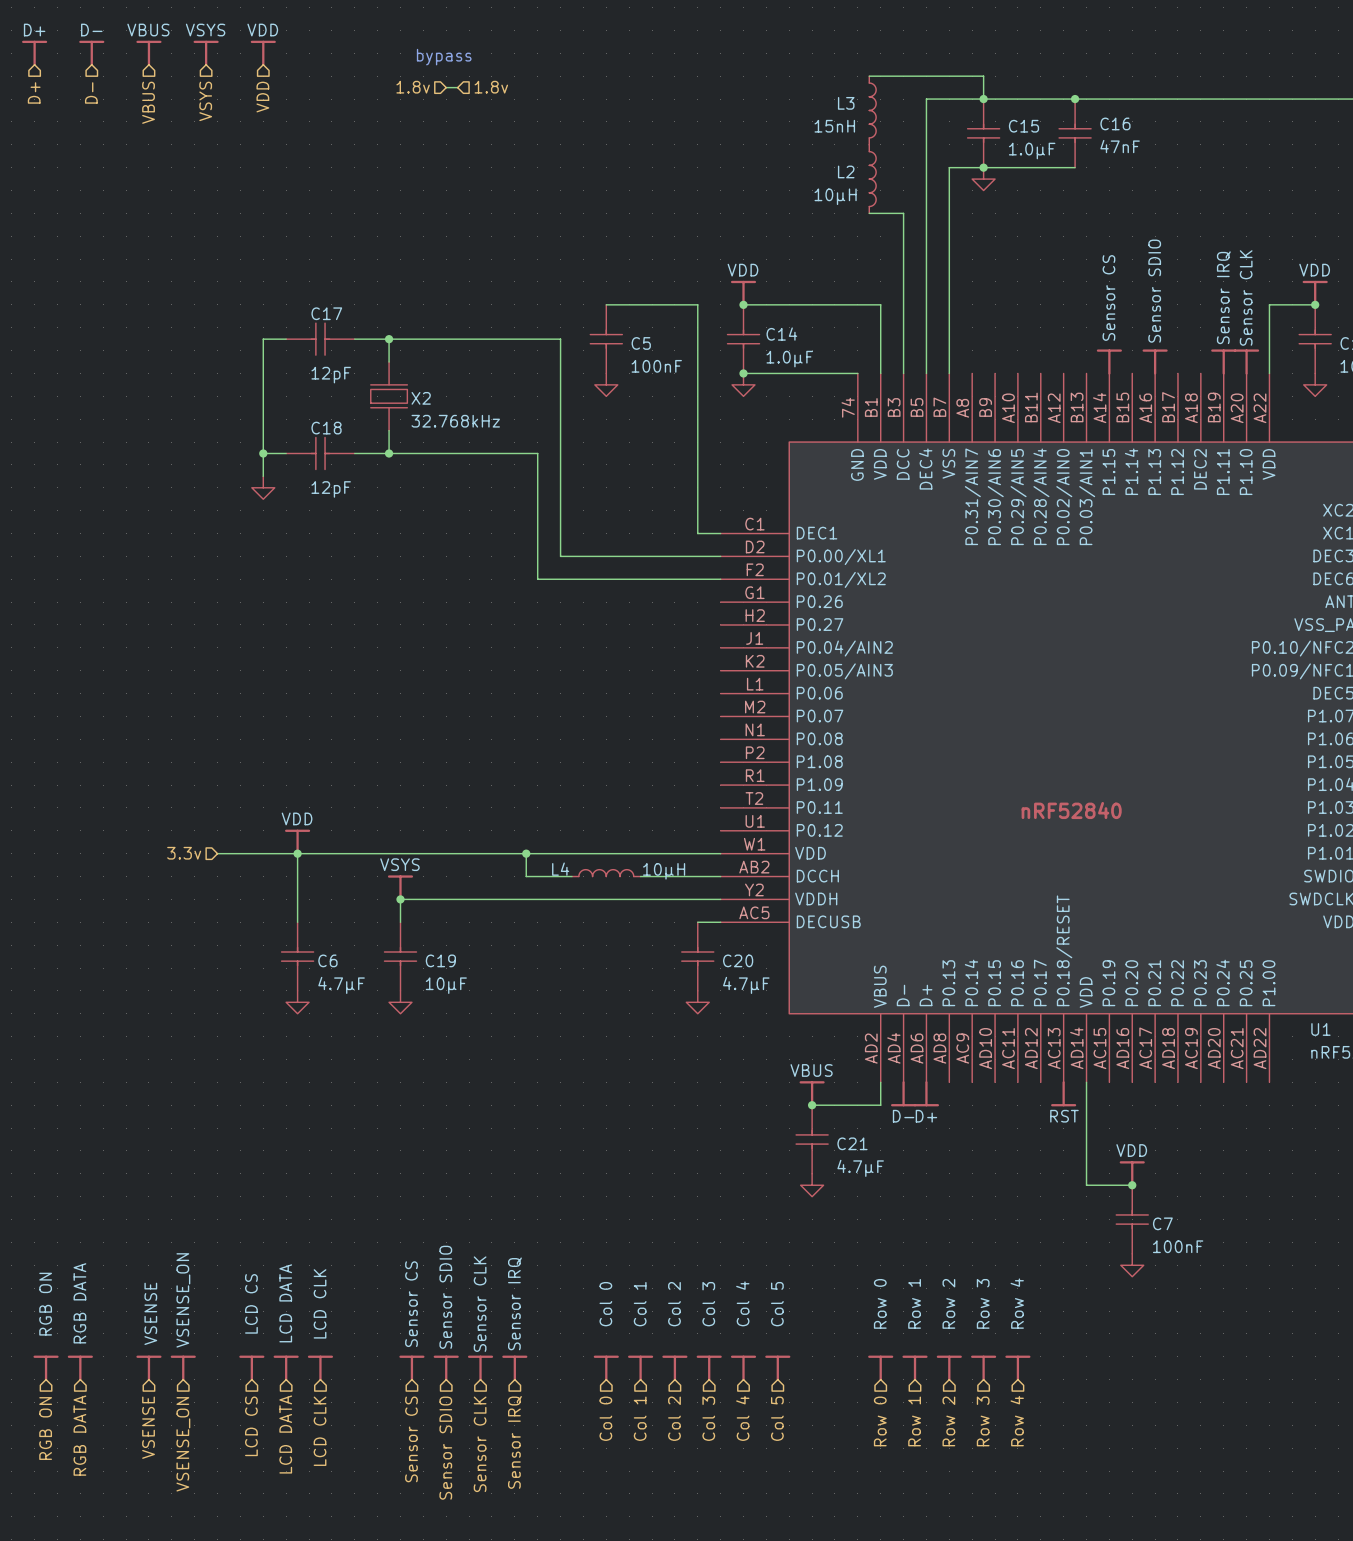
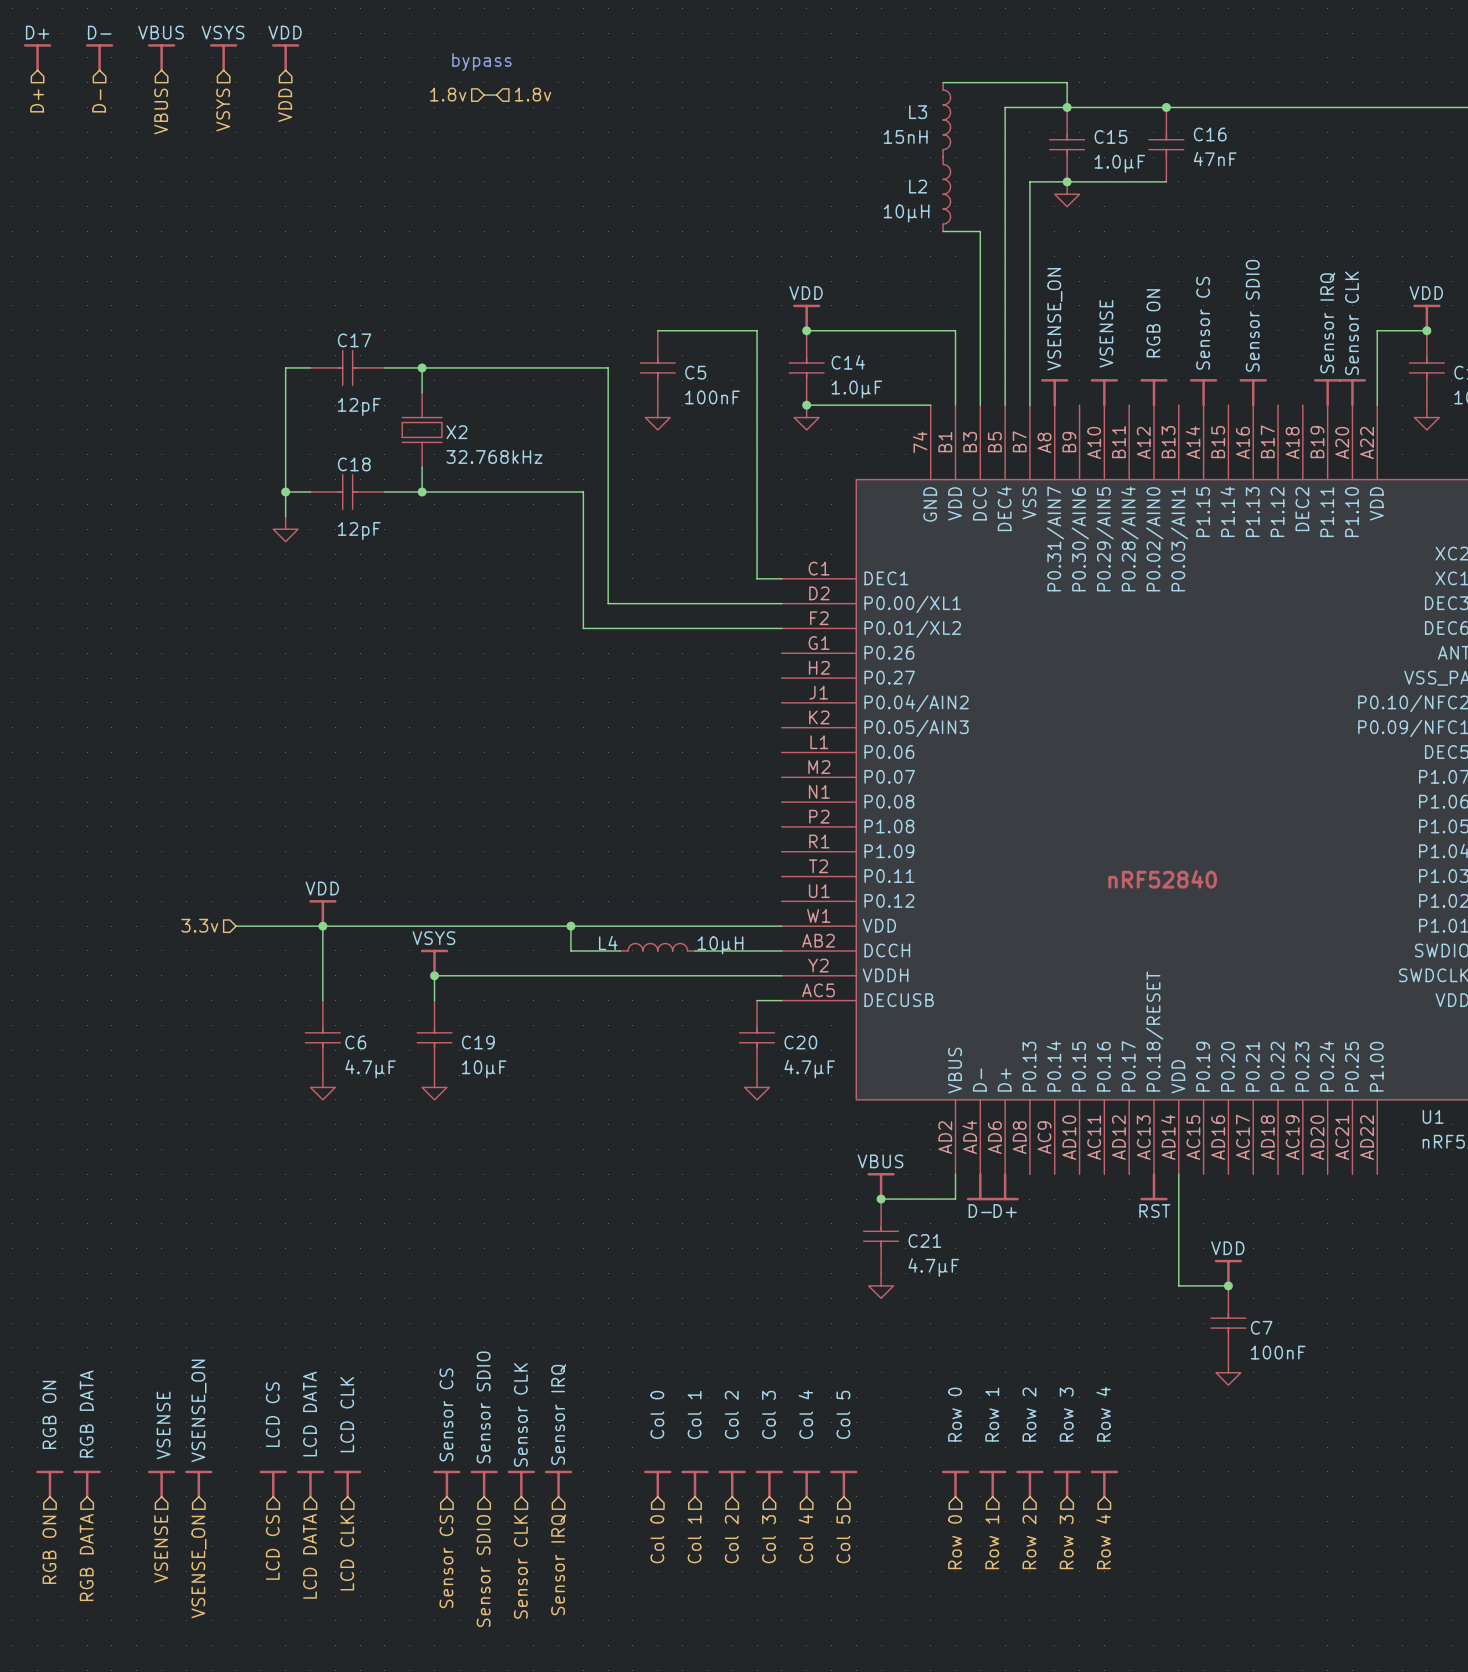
power symbol: none -> VSENSE_ON (1054, 392)
power symbol: none -> VSENSE (1104, 392)
power symbol: none -> RGB ON (1153, 392)

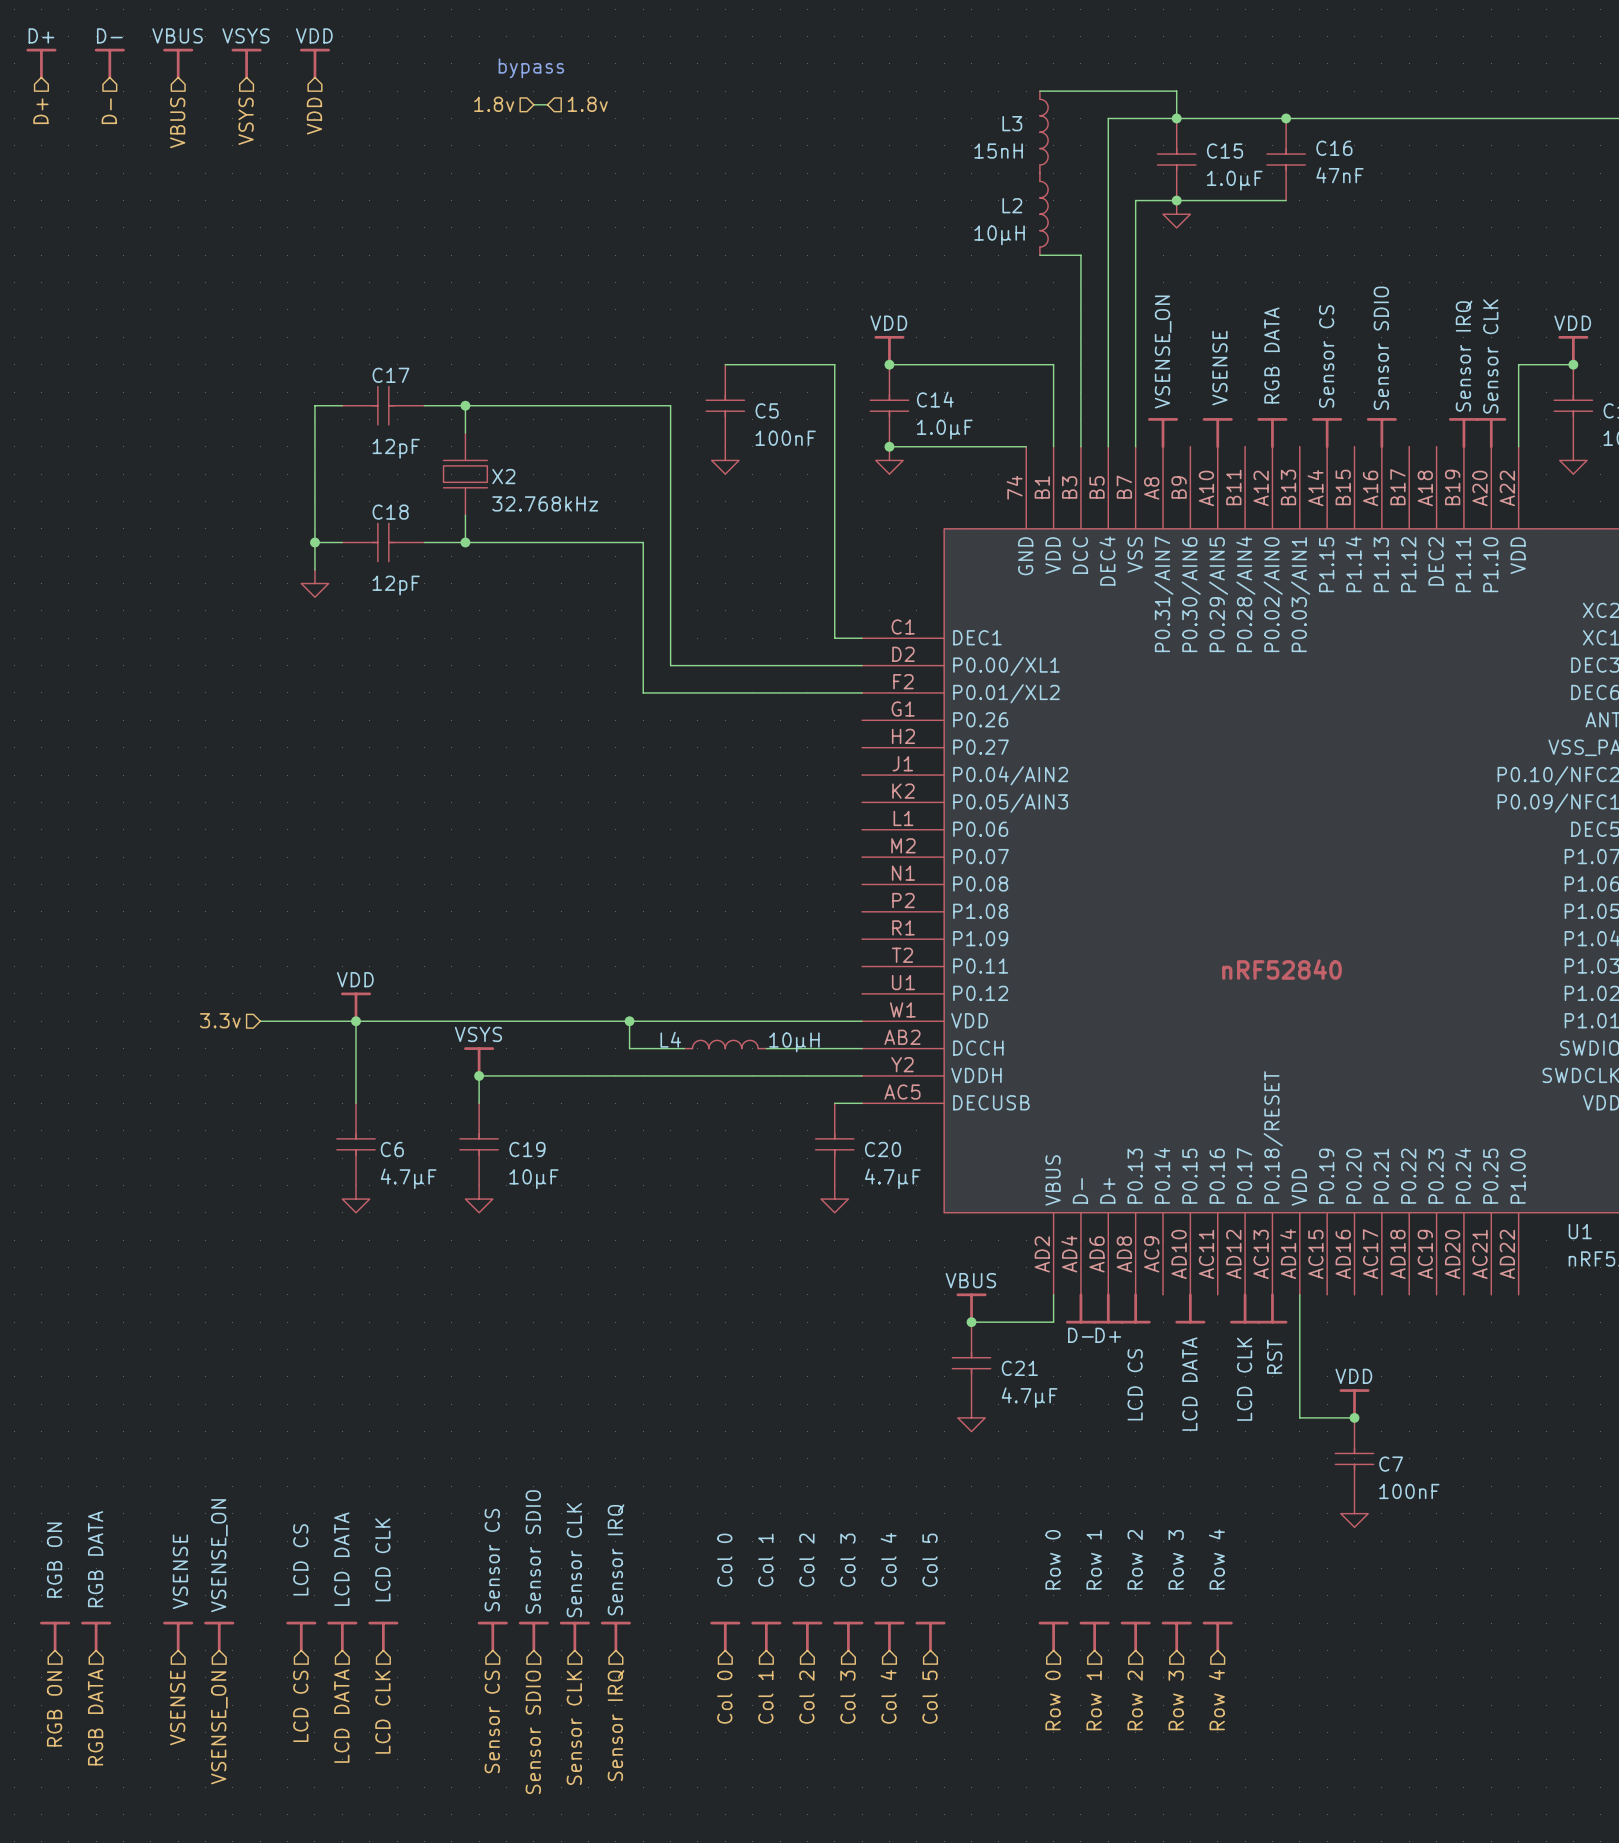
power symbol: RGB ON (1153, 392) -> RGB DATA (1272, 433)
power symbol: none -> LCD CS (1135, 1308)
power symbol: none -> LCD DATA (1190, 1308)
power symbol: none -> LCD CLK (1245, 1308)
power symbol text rotation: 0° (1154, 1211) -> 90° counterclockwise (1274, 1356)

